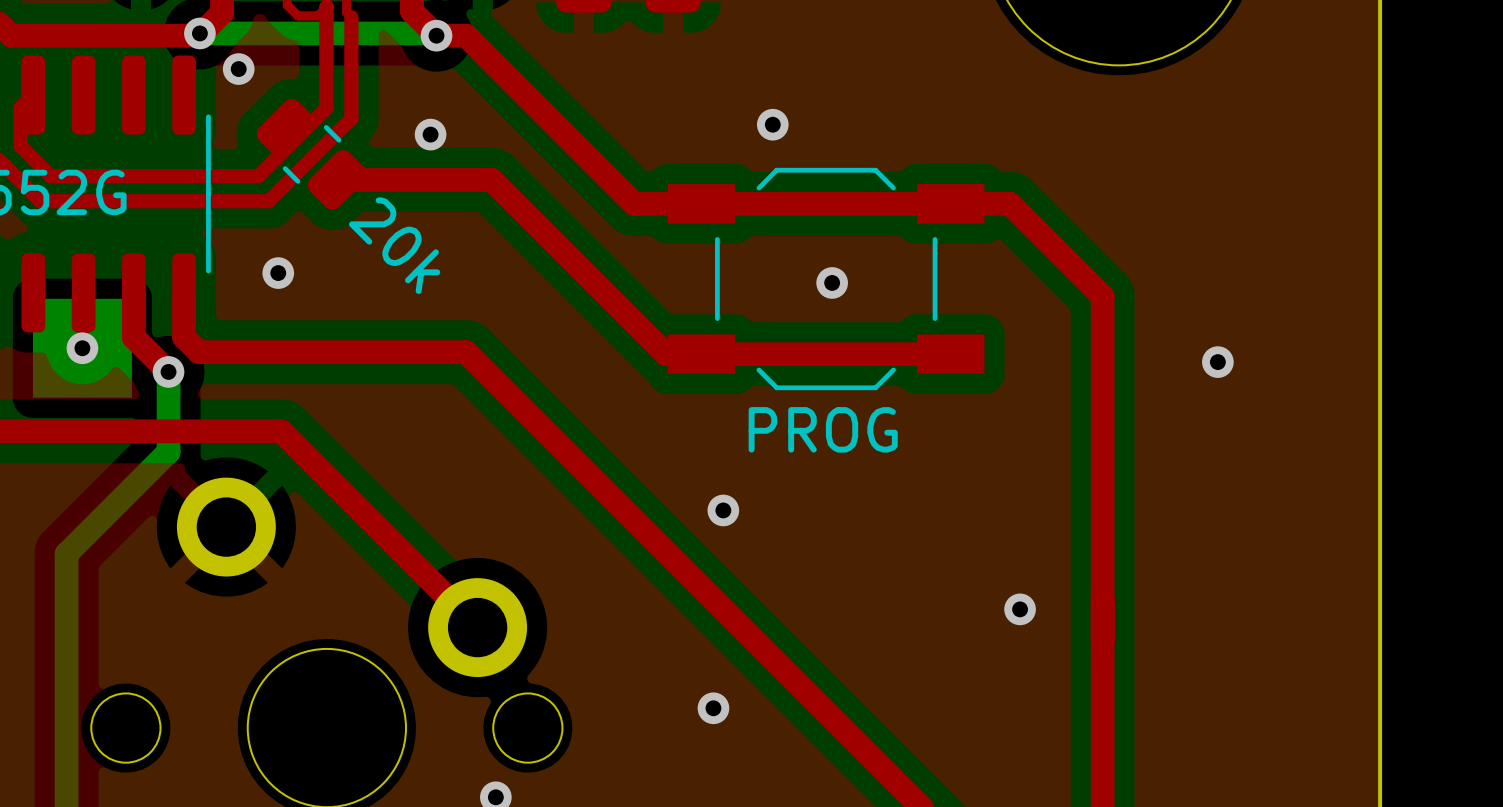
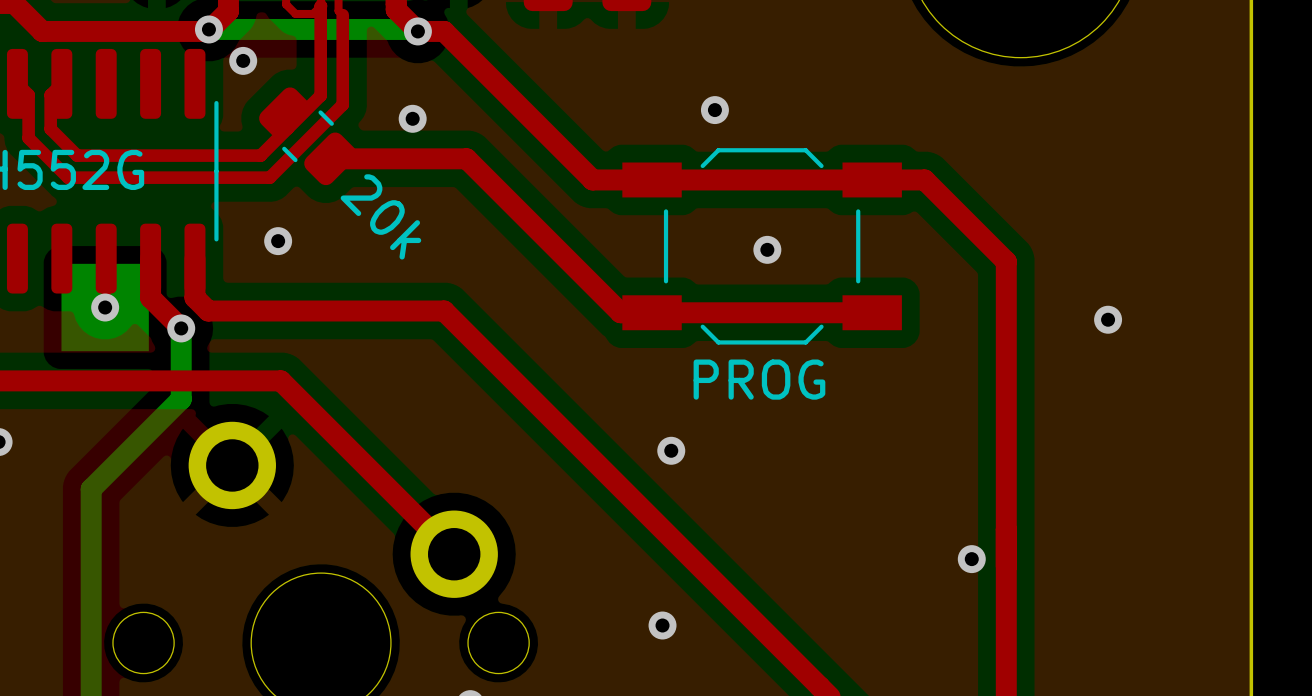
via position: (1020, 609) -> (971, 559)

